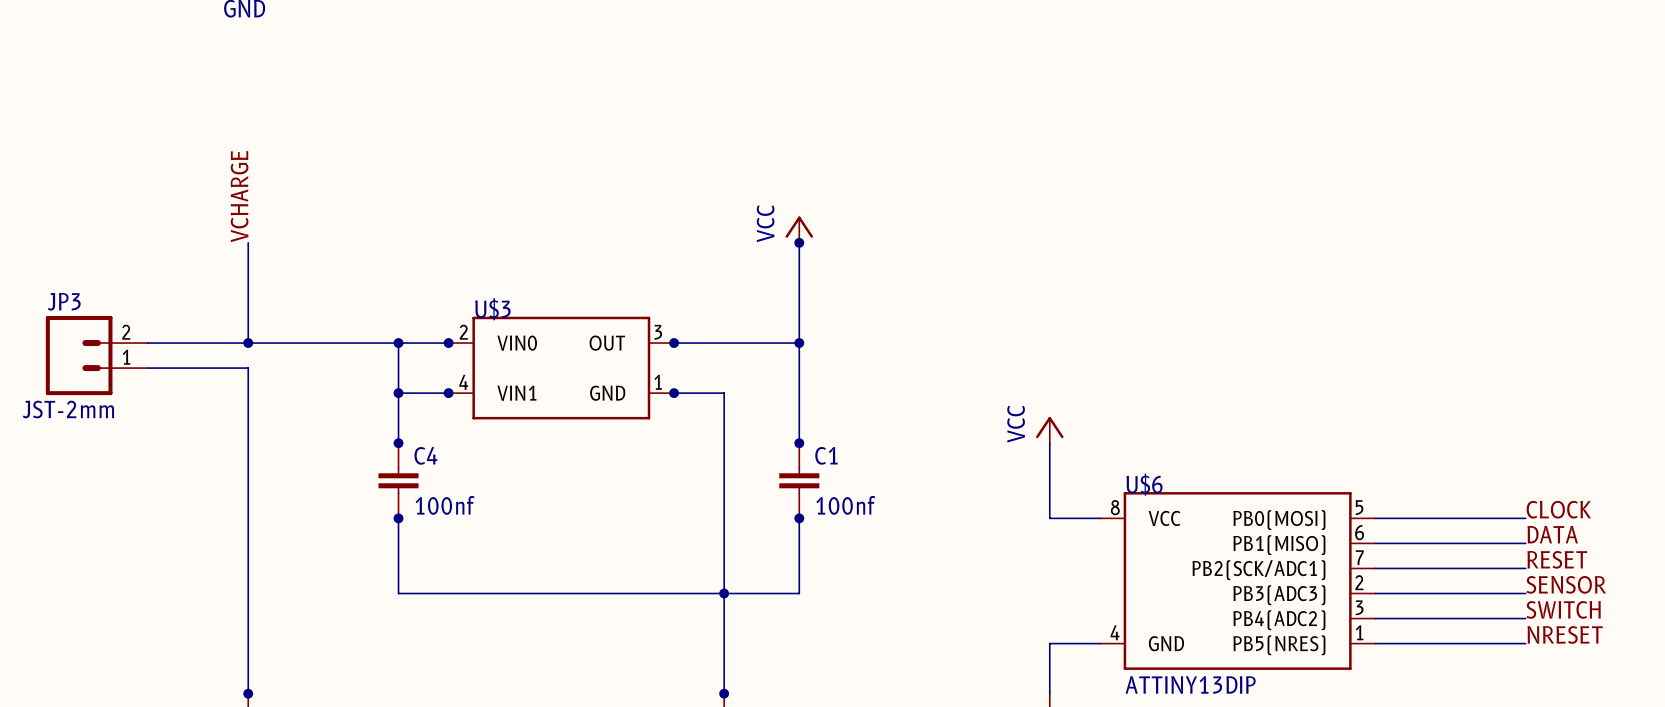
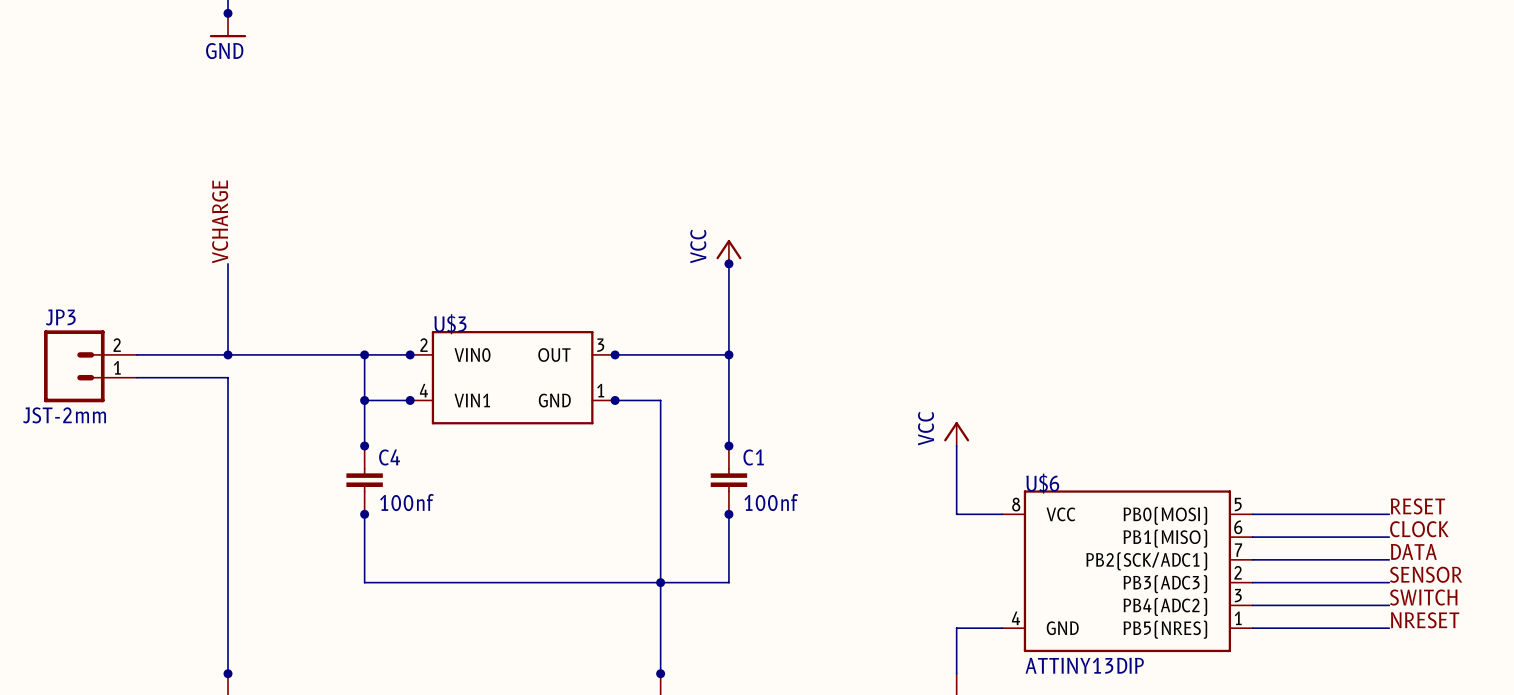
label: CLOCK (1558, 509) -> RESET (1417, 506)
label: DATA (1552, 534) -> CLOCK (1419, 529)
label: RESET (1557, 559) -> DATA (1413, 551)

